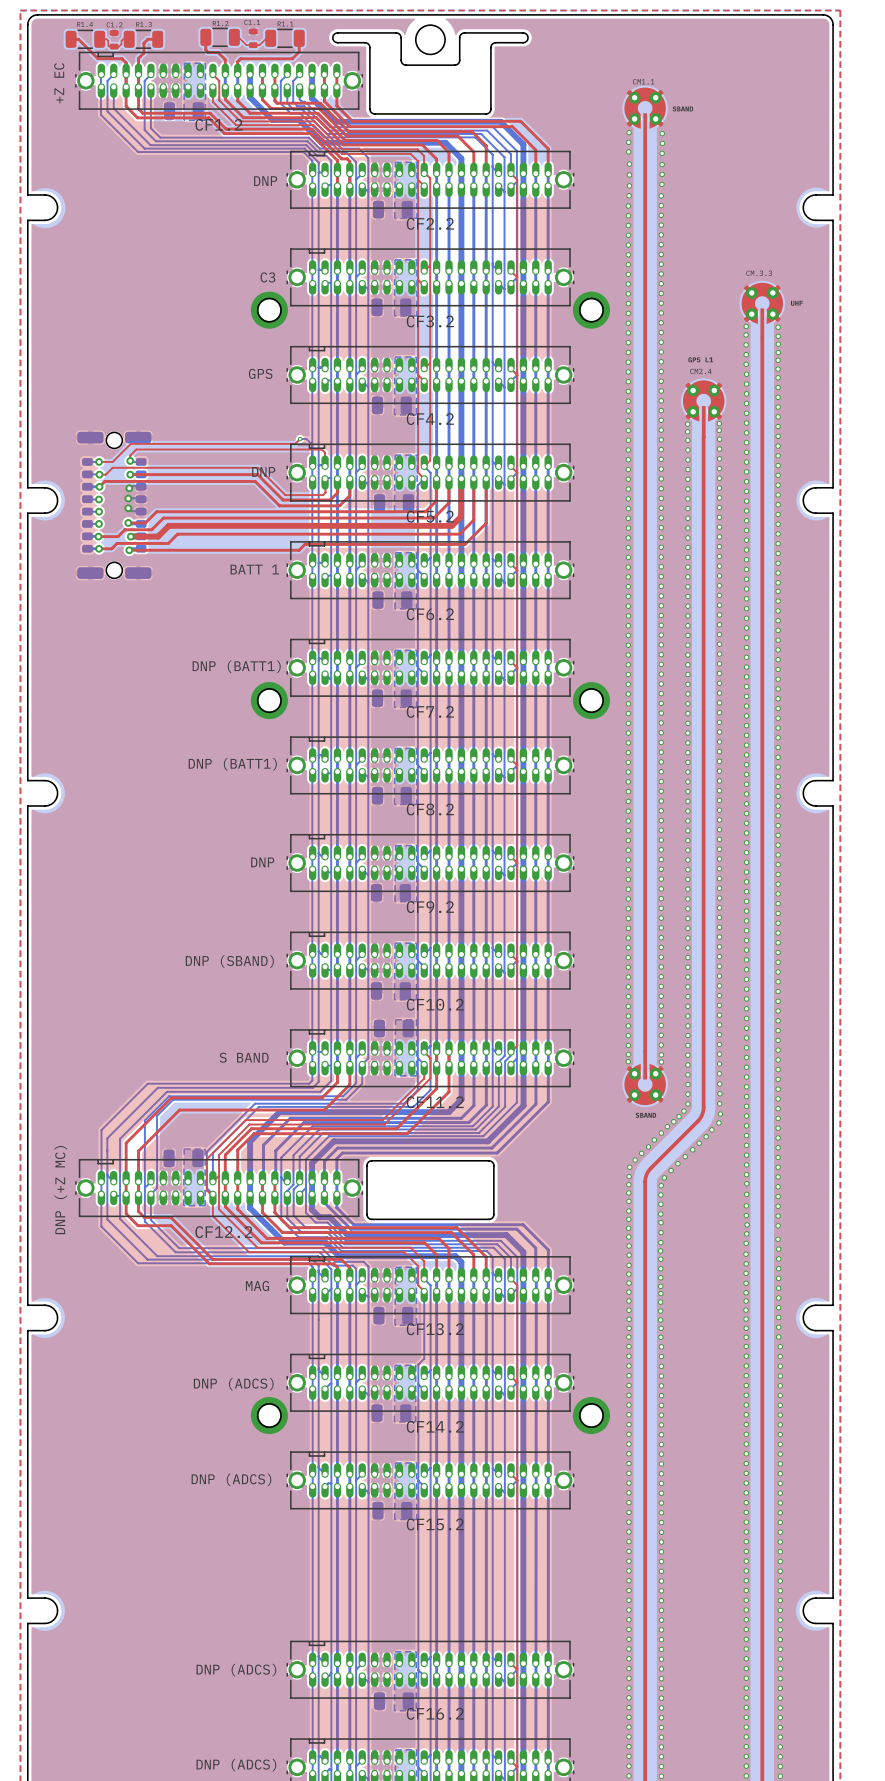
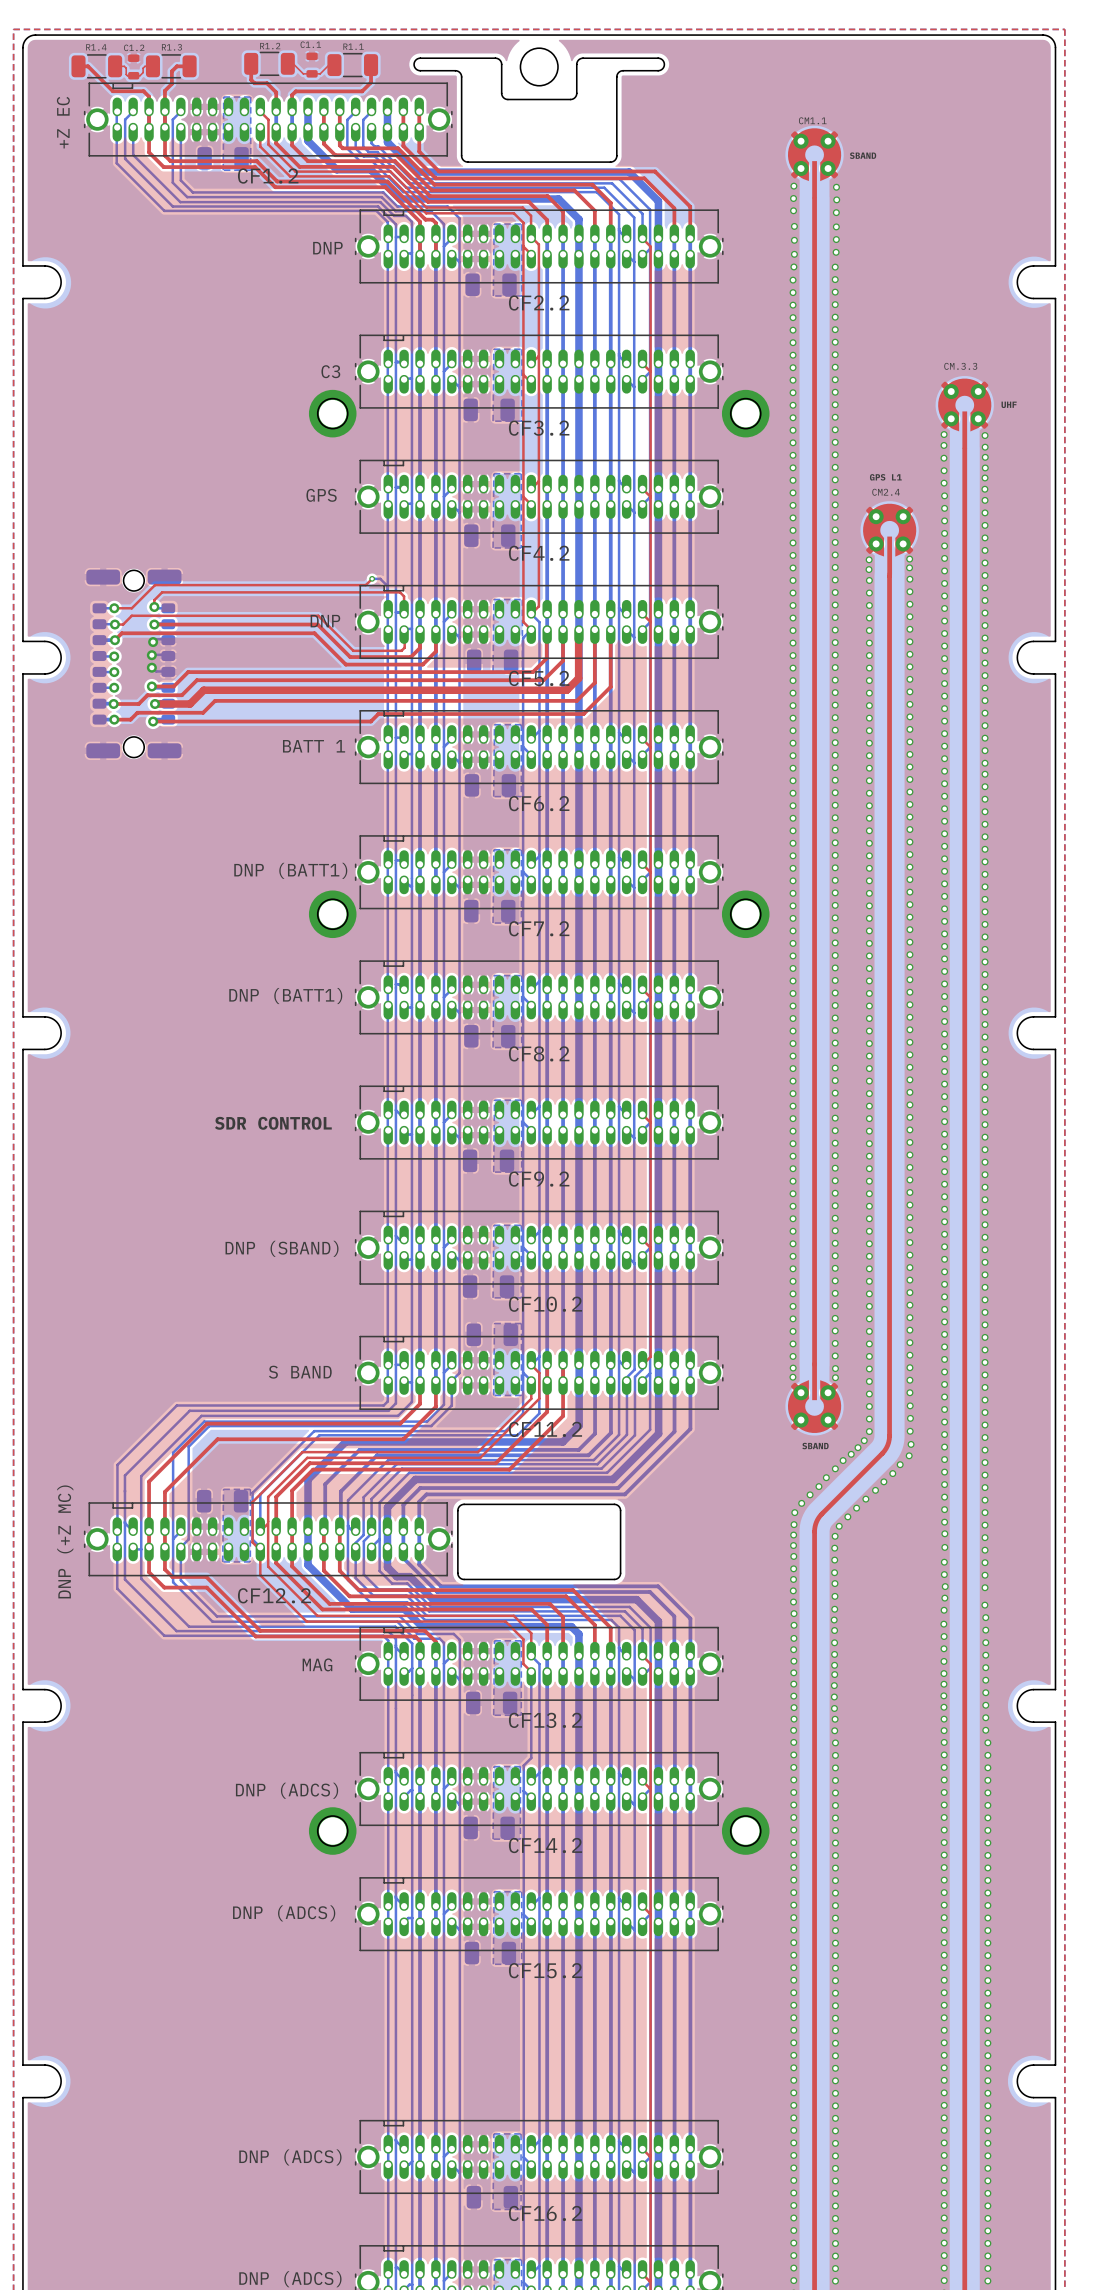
text: DNP (262, 862) -> none
text: none -> SDR CONTROL (273, 1123)

